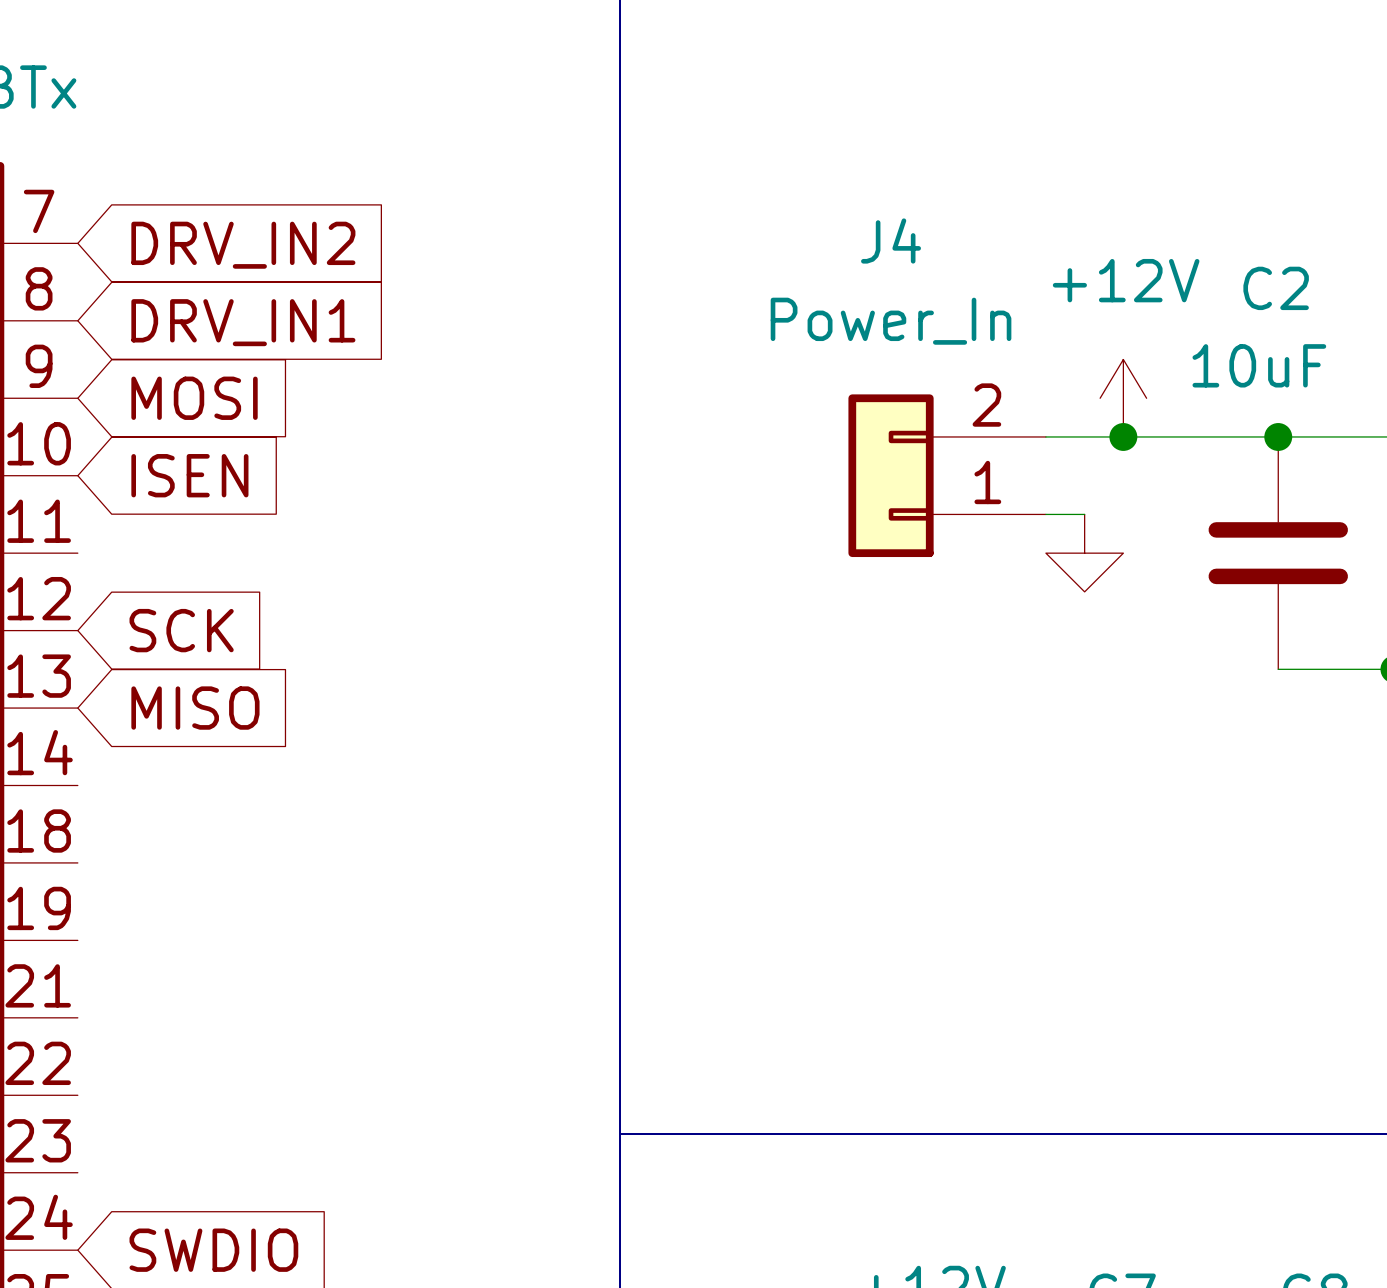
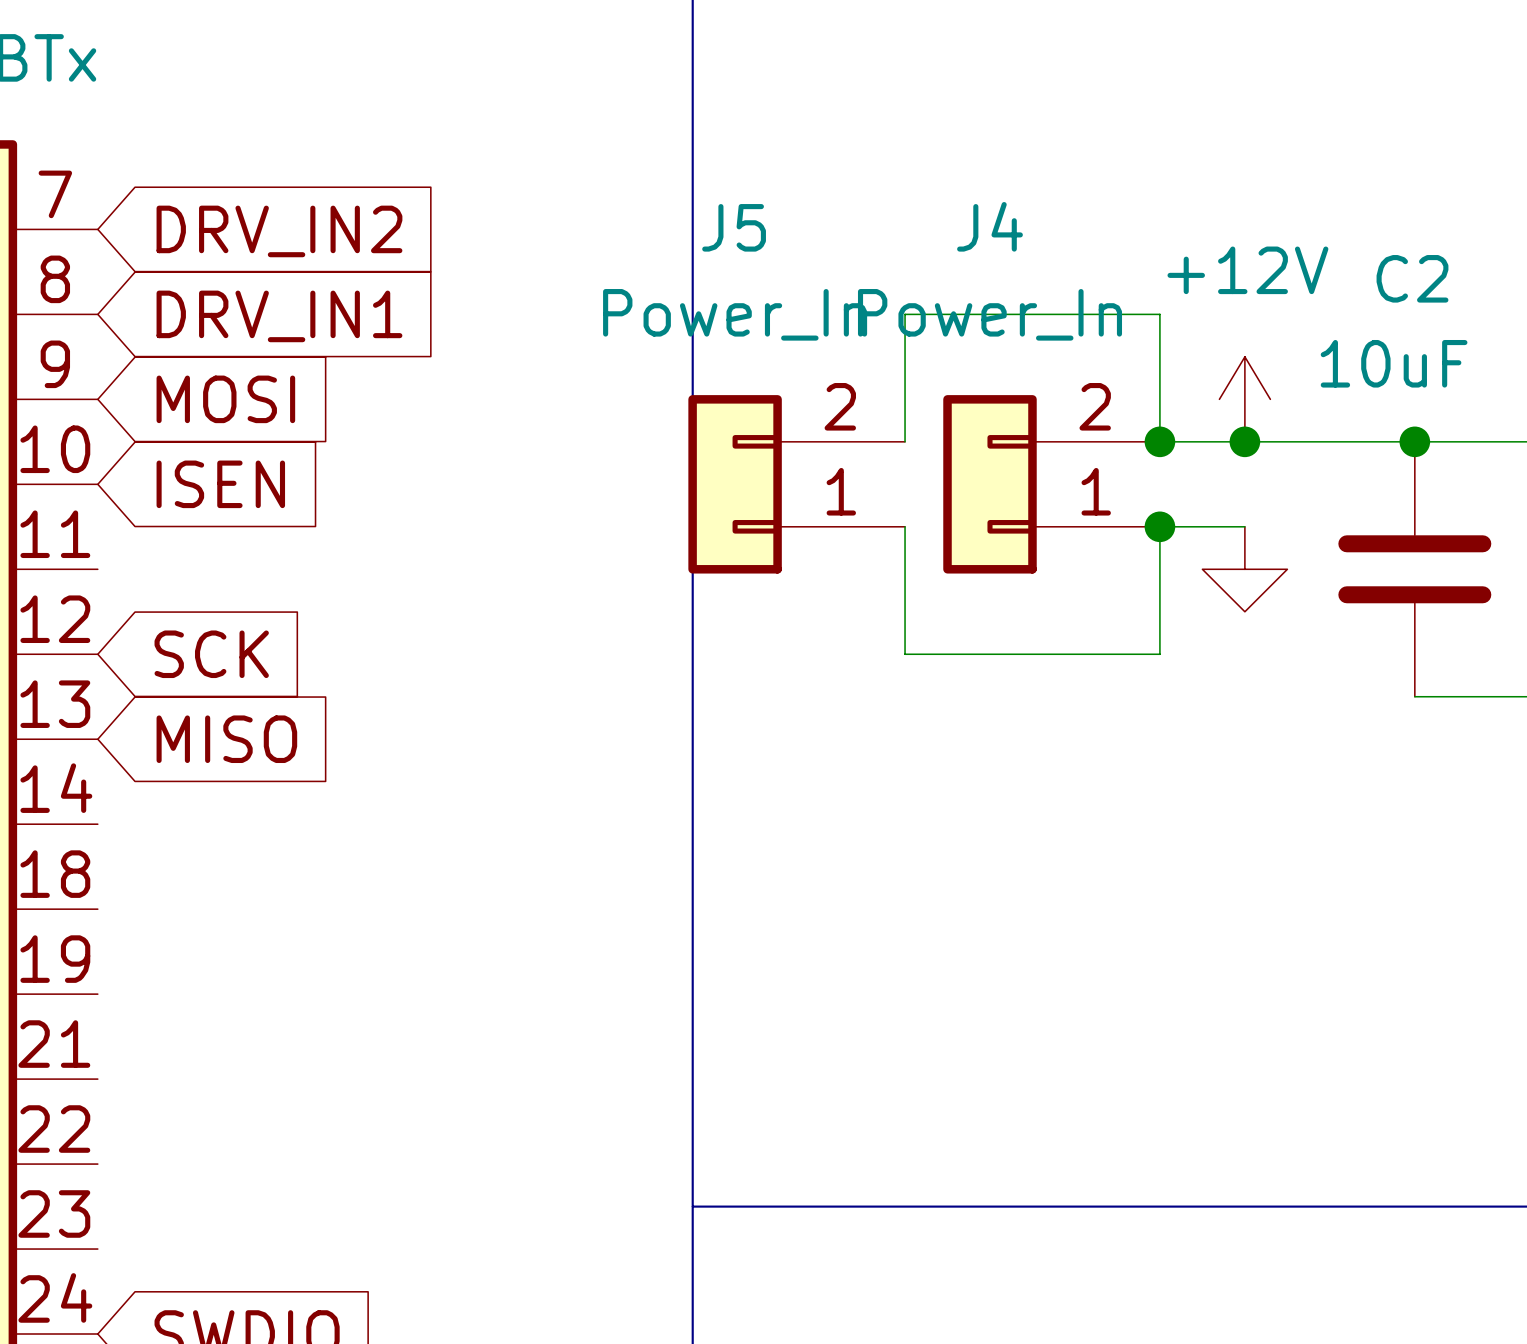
wire: none -> (905, 441) (905, 314) (1159, 314) (1159, 441)
junction: none -> (1159, 441)
J5: none -> Power_In (796, 484)
wire: none -> (905, 526) (905, 654) (1159, 654) (1159, 526)
junction: none -> (1159, 526)
wire: none -> (1202, 526) (1244, 526)
power symbol position: (1084, 553) -> (1244, 569)

